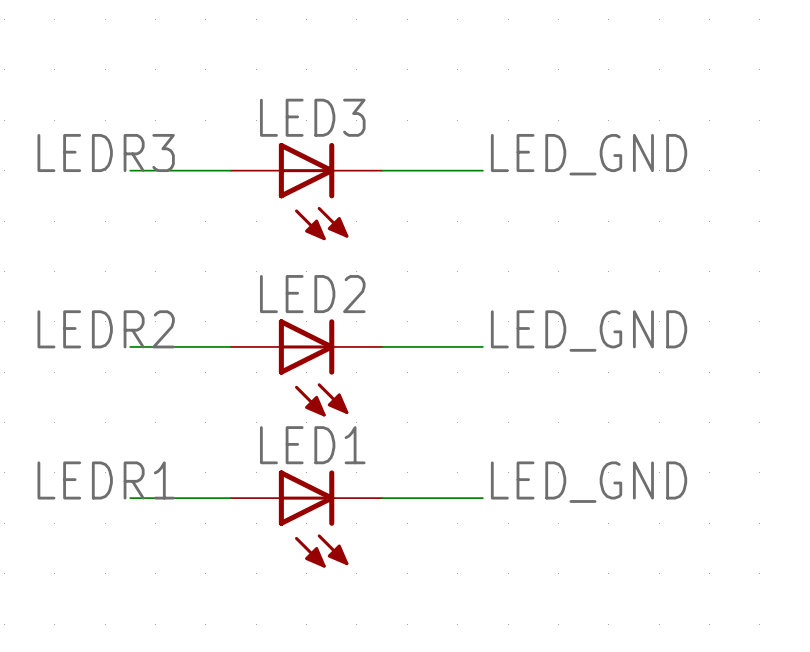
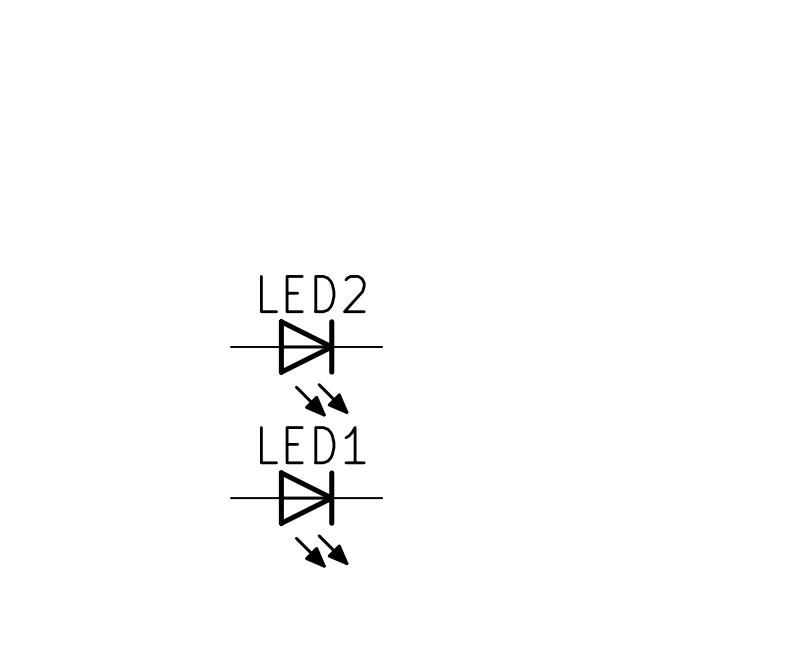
label: LEDR3 (106, 153) -> none
label: LED_GND (589, 154) -> none
wire: (130, 170) (230, 170) -> none
wire: (382, 170) (482, 170) -> none
LED3: (306, 191) -> none
label: LEDR2 (106, 329) -> none
label: LED_GND (589, 331) -> none
wire: (130, 346) (230, 346) -> none
wire: (382, 346) (482, 346) -> none
label: LEDR1 (106, 480) -> none
label: LED_GND (589, 482) -> none
wire: (130, 498) (230, 498) -> none
wire: (382, 498) (482, 498) -> none

